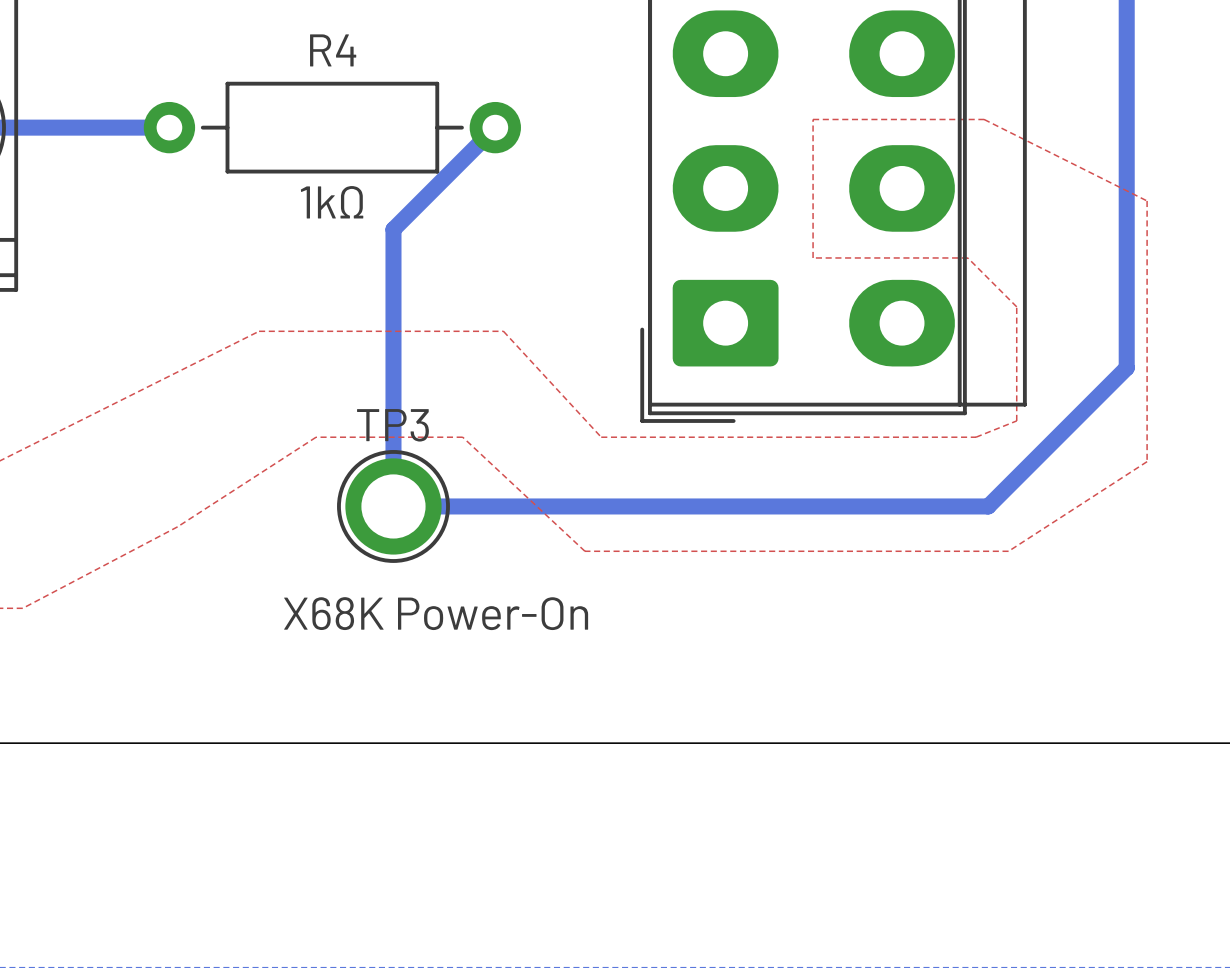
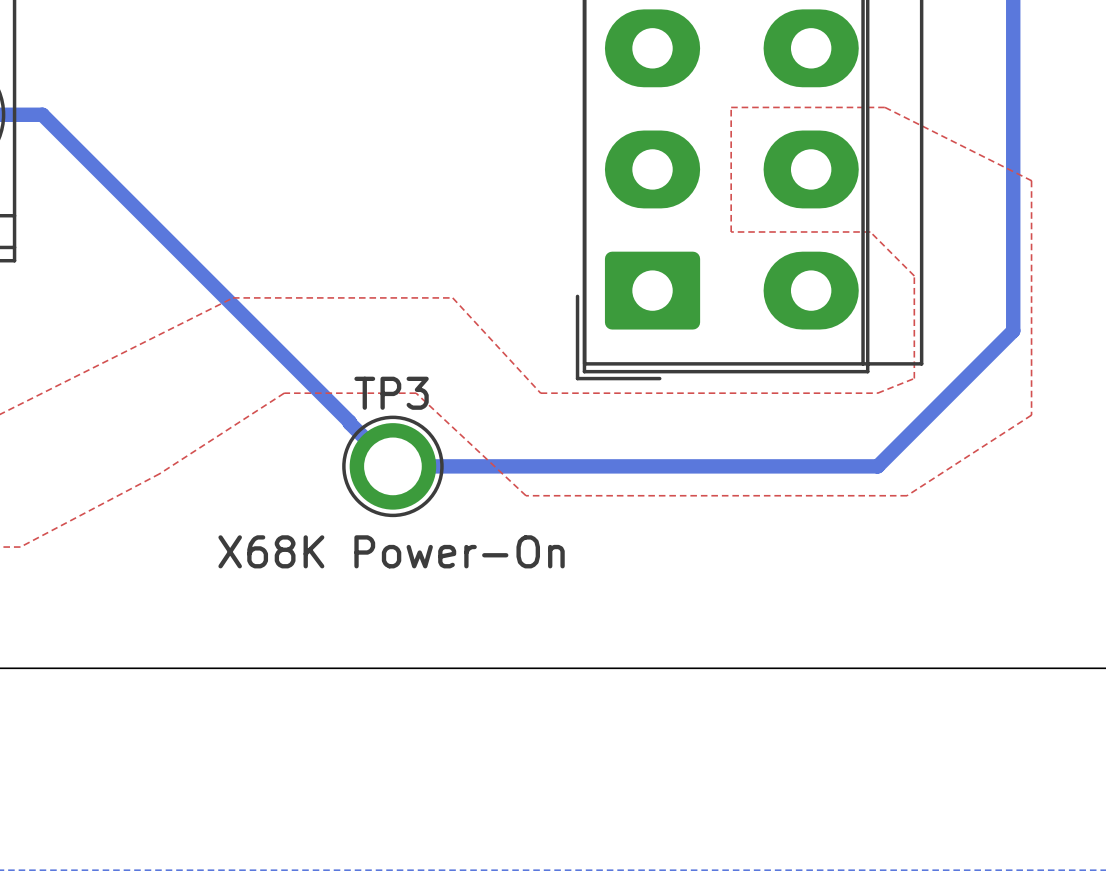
bottom track: (47, 127) (169, 127) -> none
R4: 1kΩ (332, 127) -> none
bottom track: (495, 127) (393, 229) (393, 506) (988, 506) -> (42, 114) (392, 466) (877, 466) (888, 455)
TP3 position: (393, 506) -> (392, 466)

